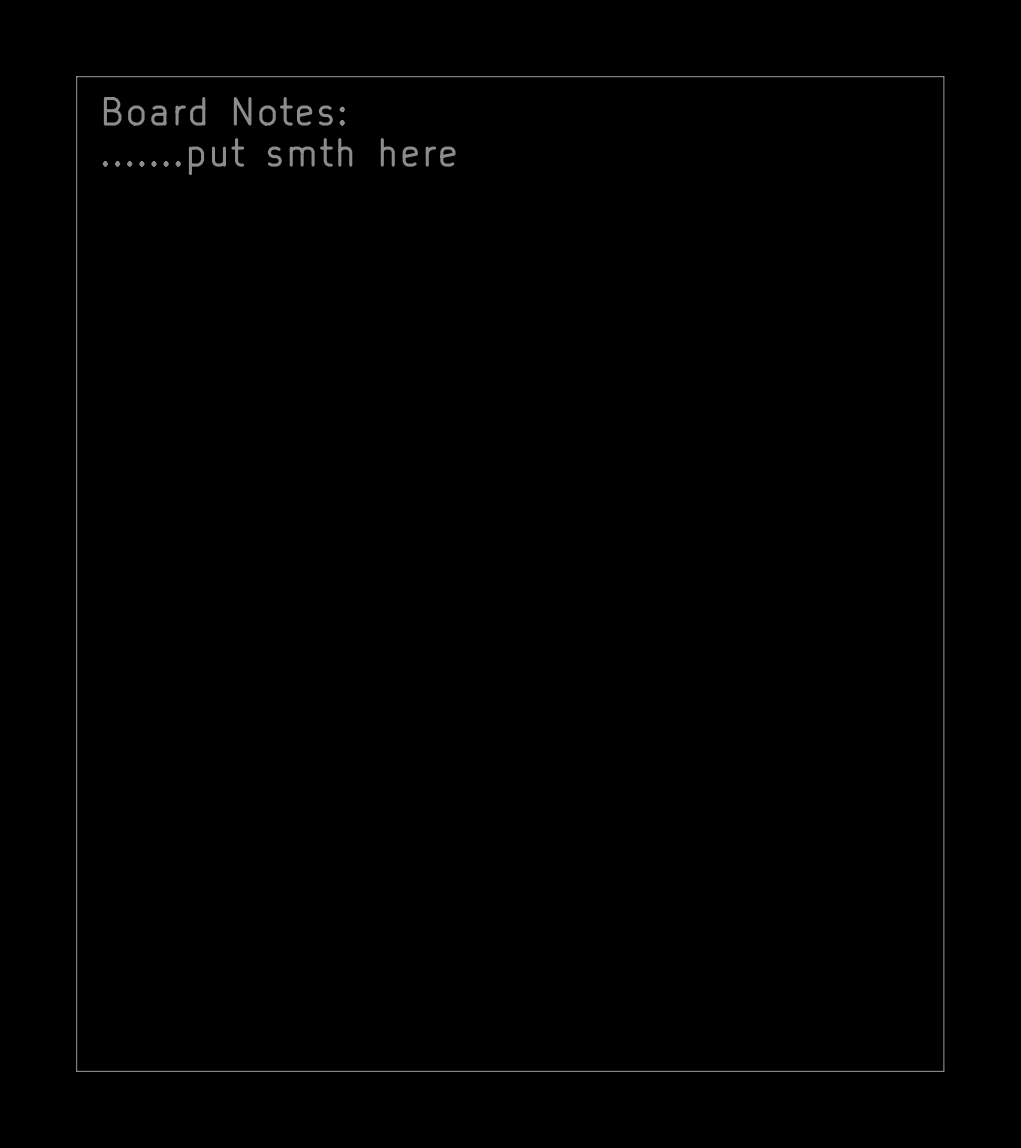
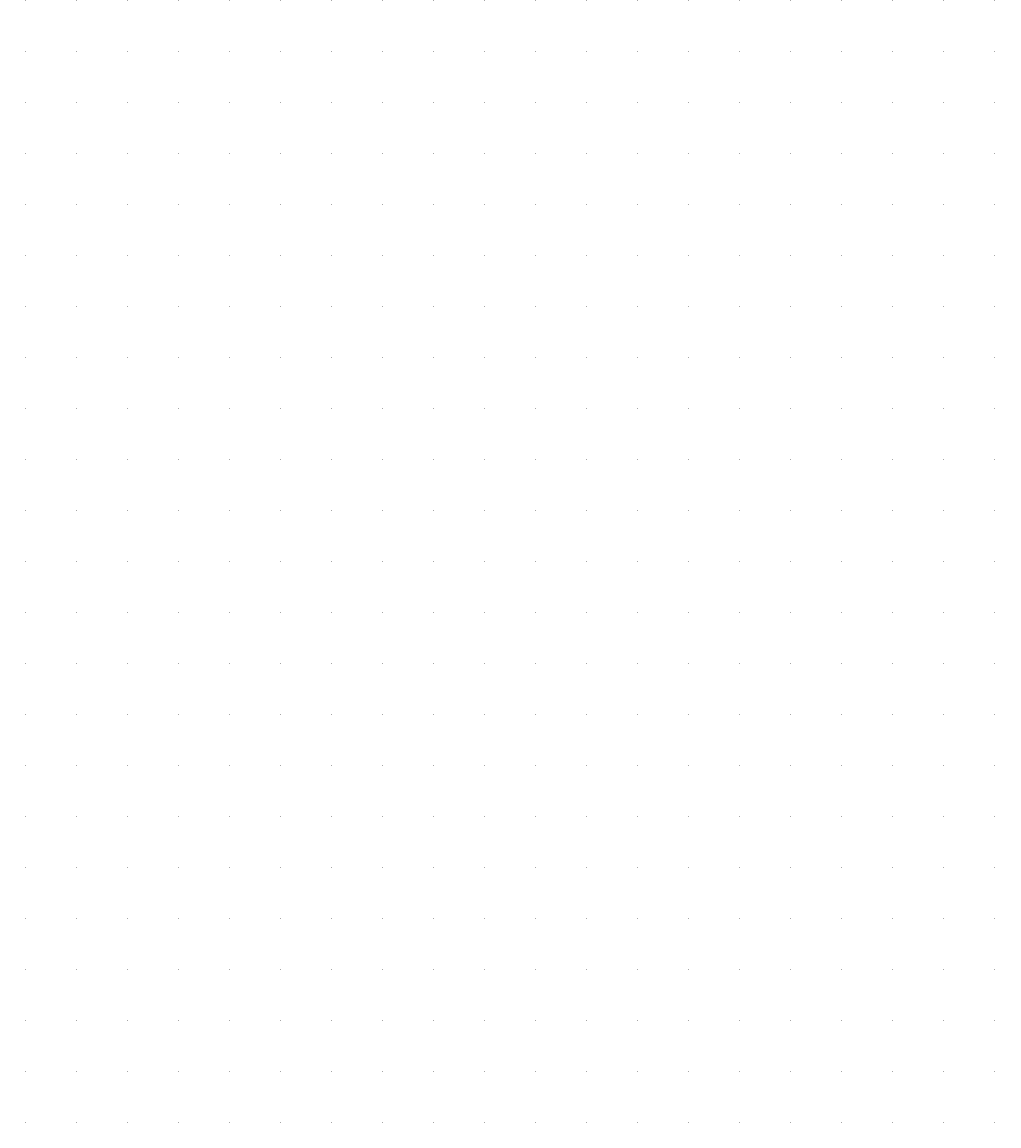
line: (76, 76) (943, 76) (943, 1071) (76, 1071) (76, 76) -> none
text: Board Notes: (224, 111) -> none
text: .......put smth here (279, 156) -> none

